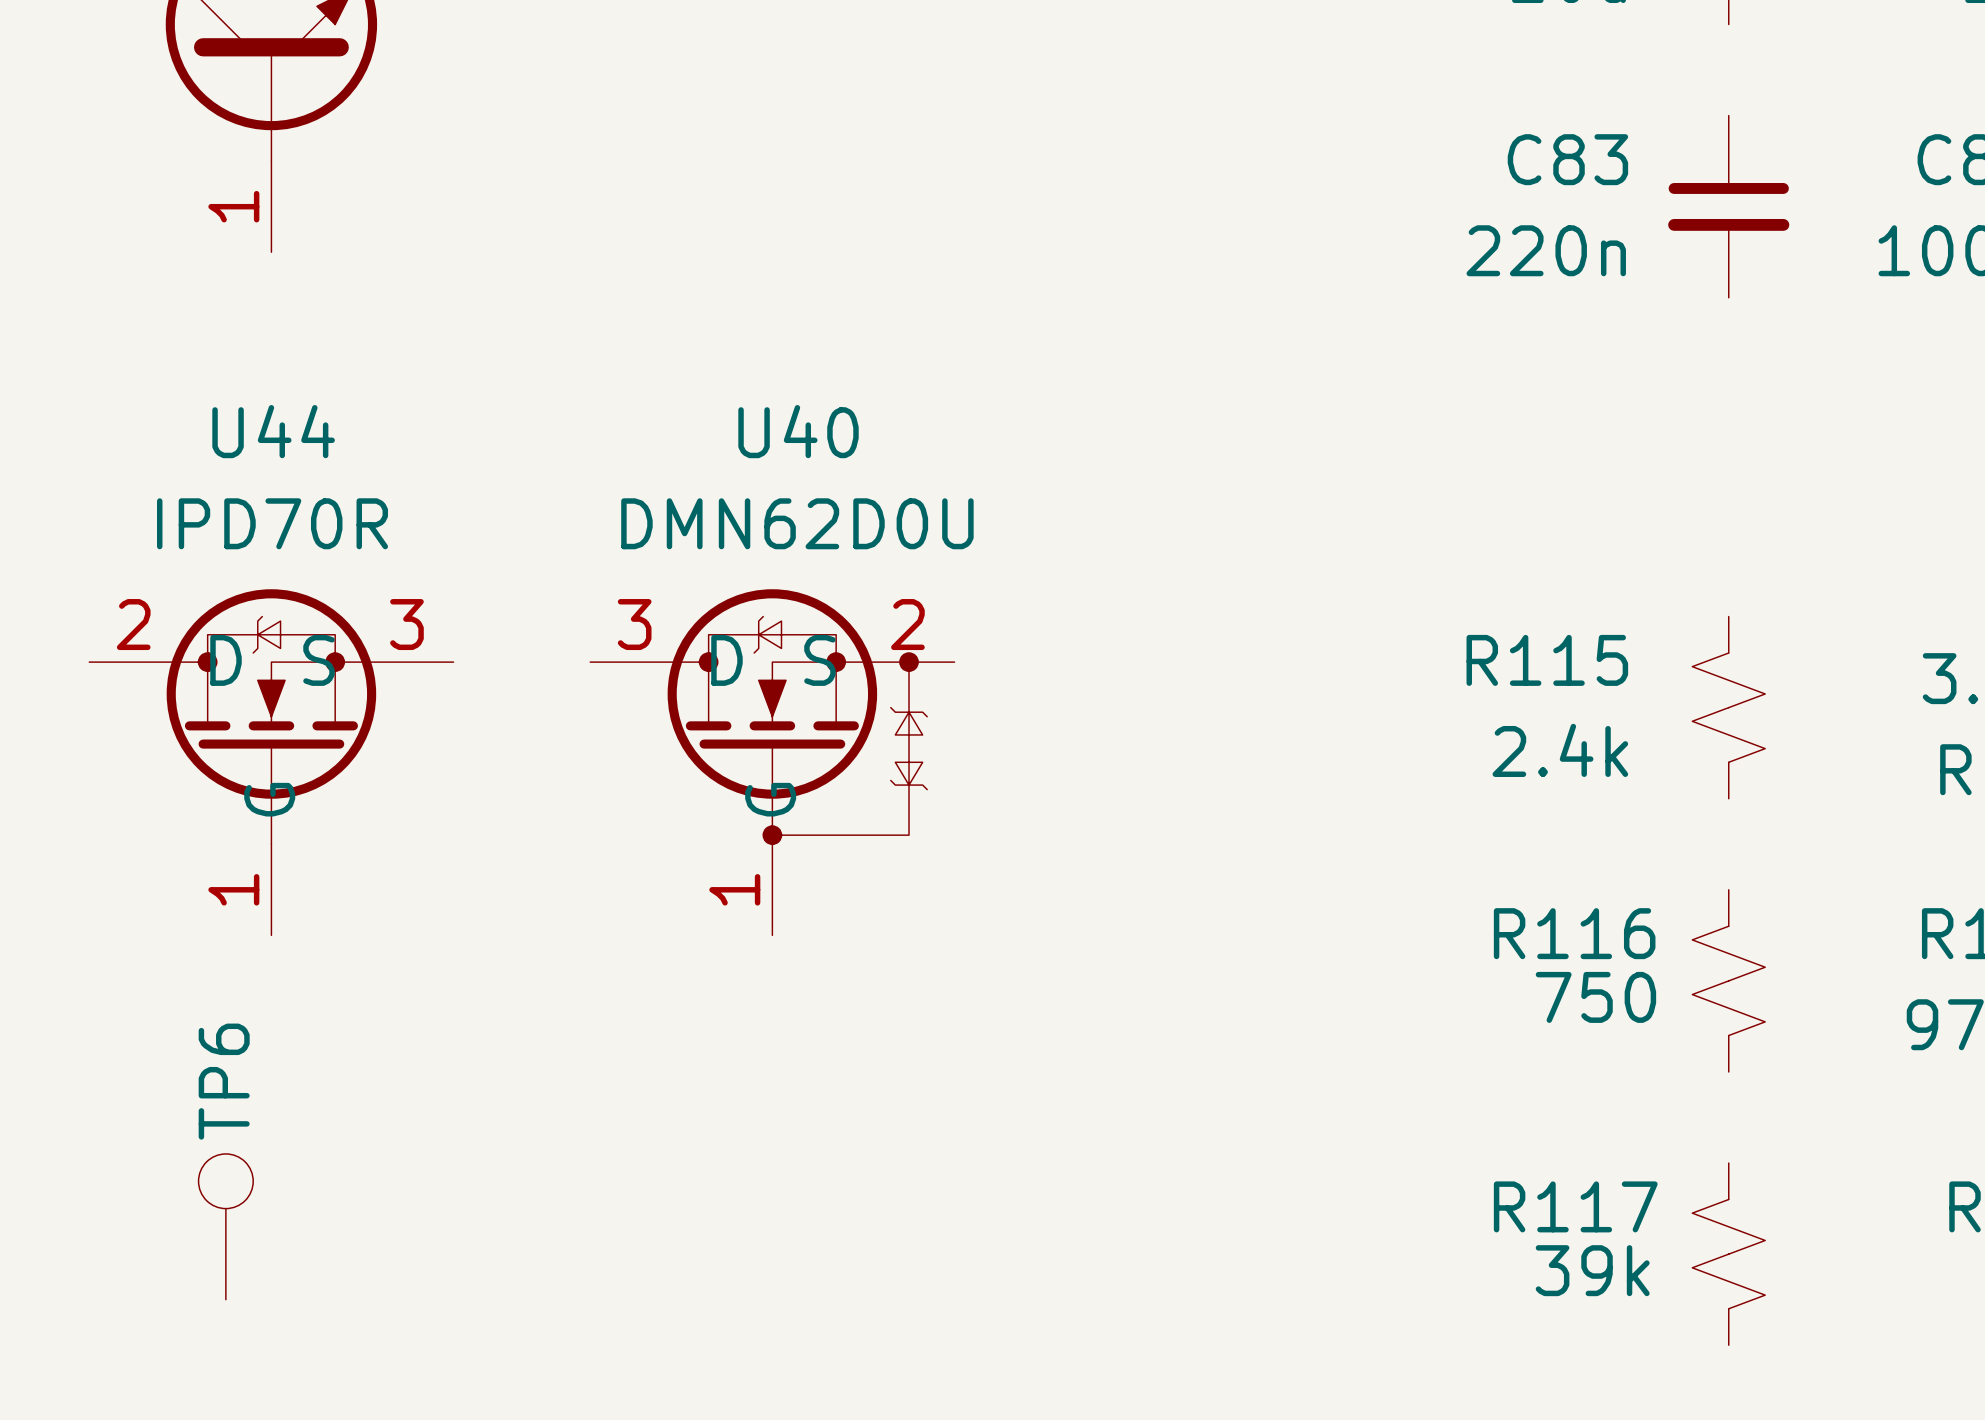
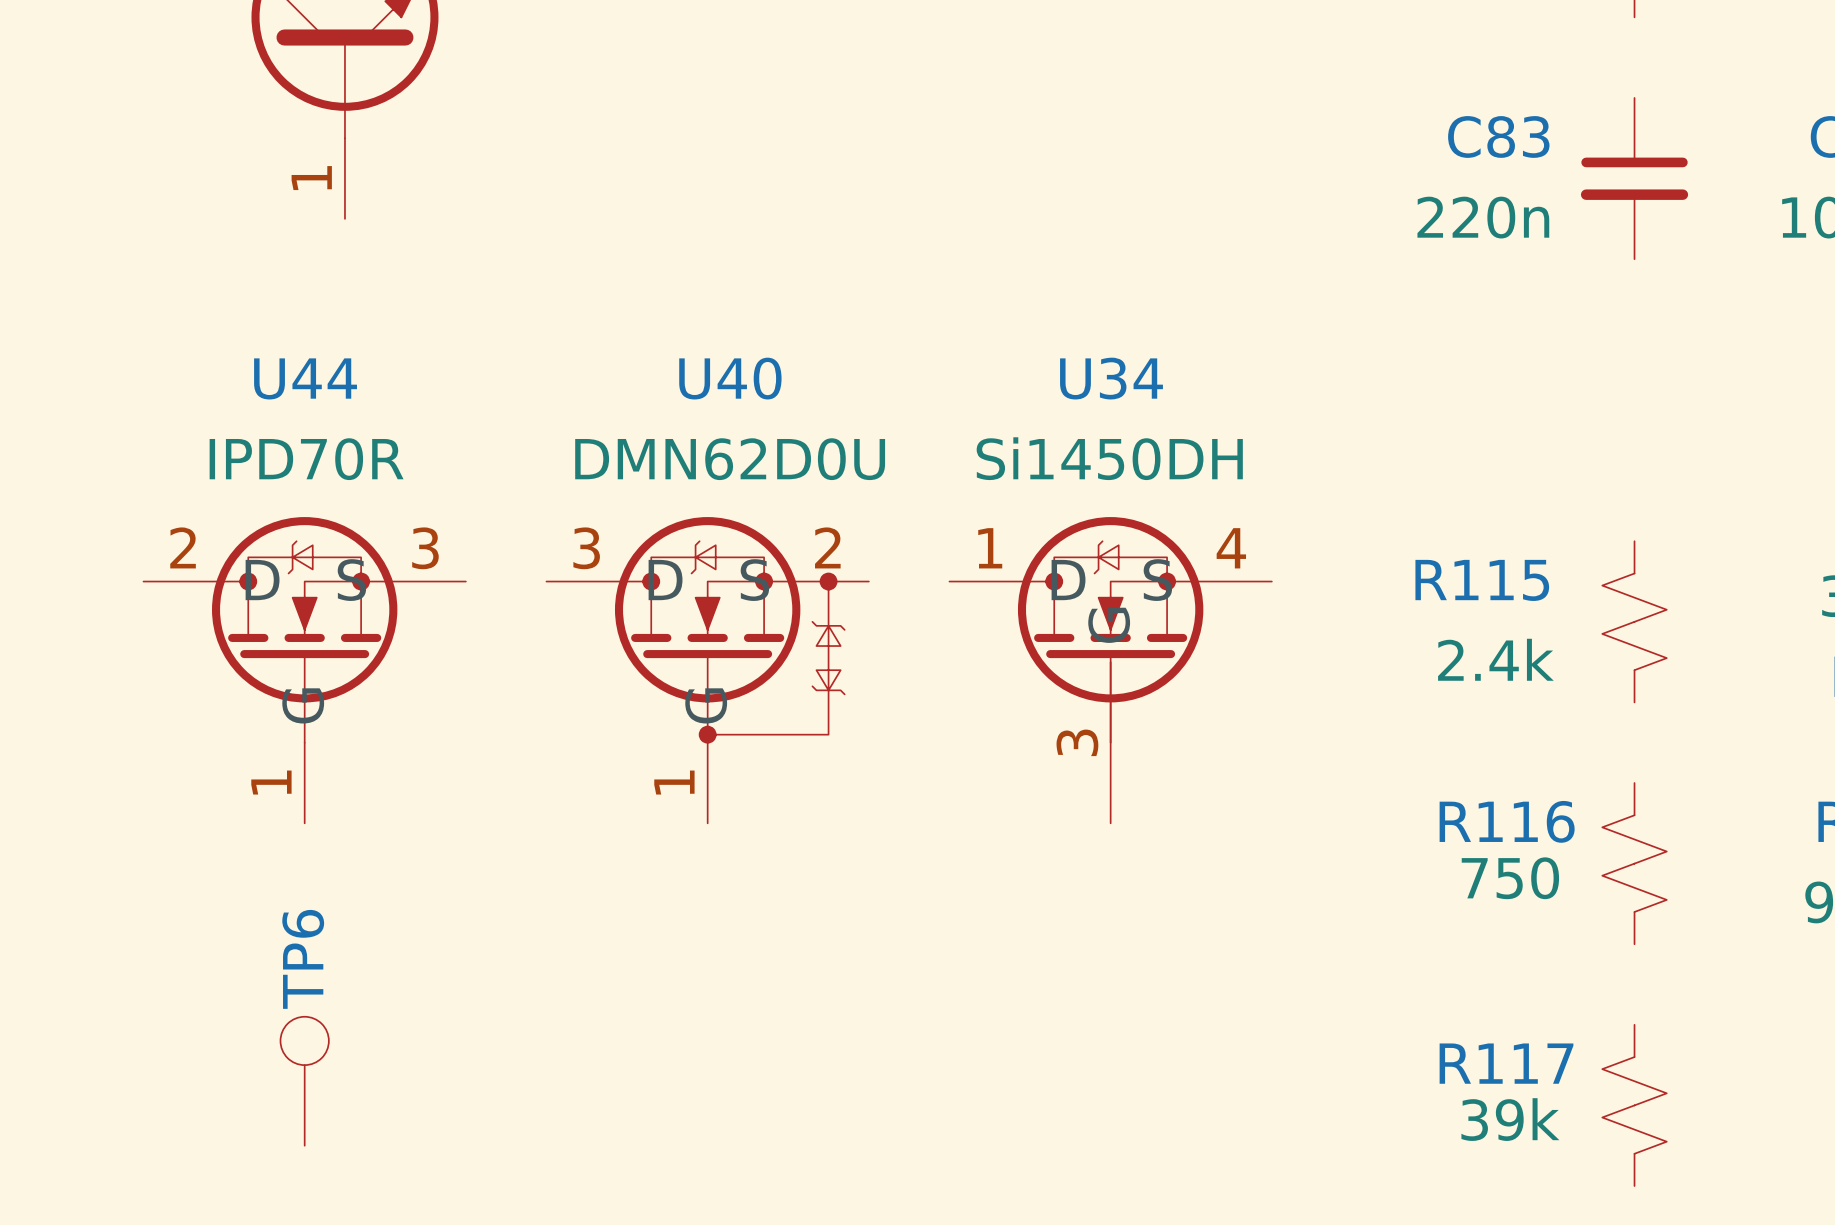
U44 position: (271, 762) -> (304, 670)
U40 position: (772, 762) -> (707, 670)
U34: none -> Si1450DH (1110, 670)

